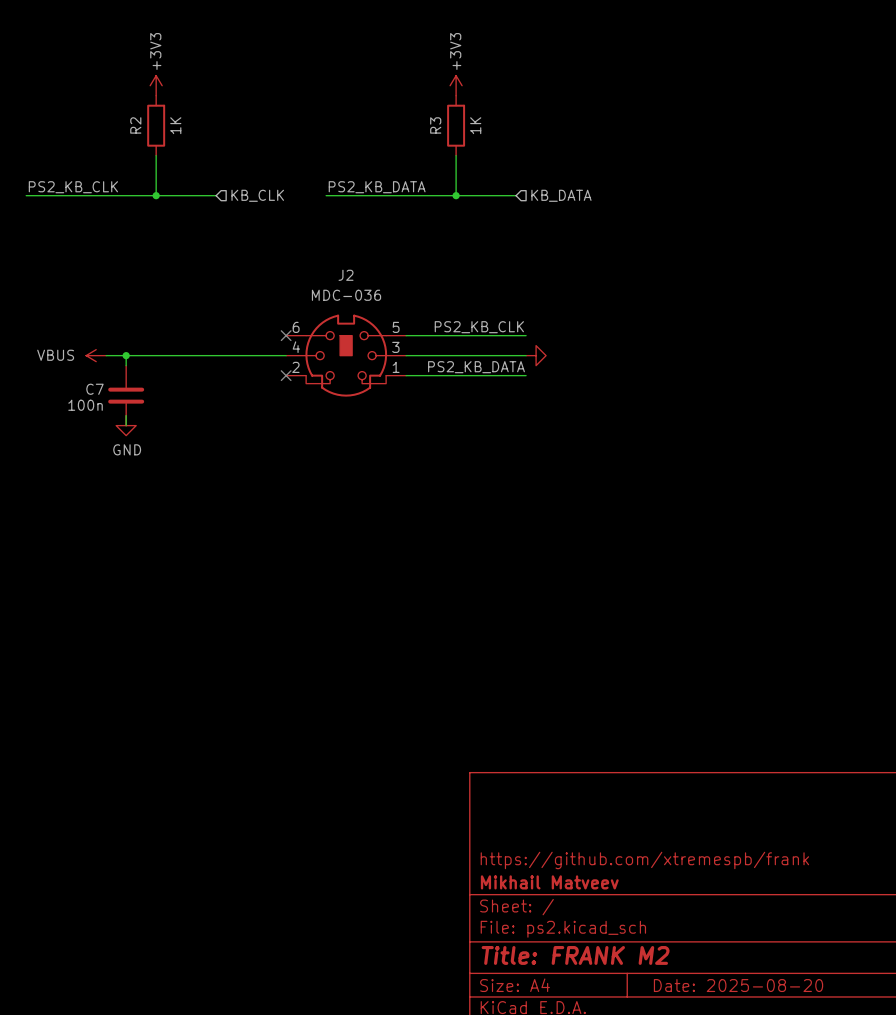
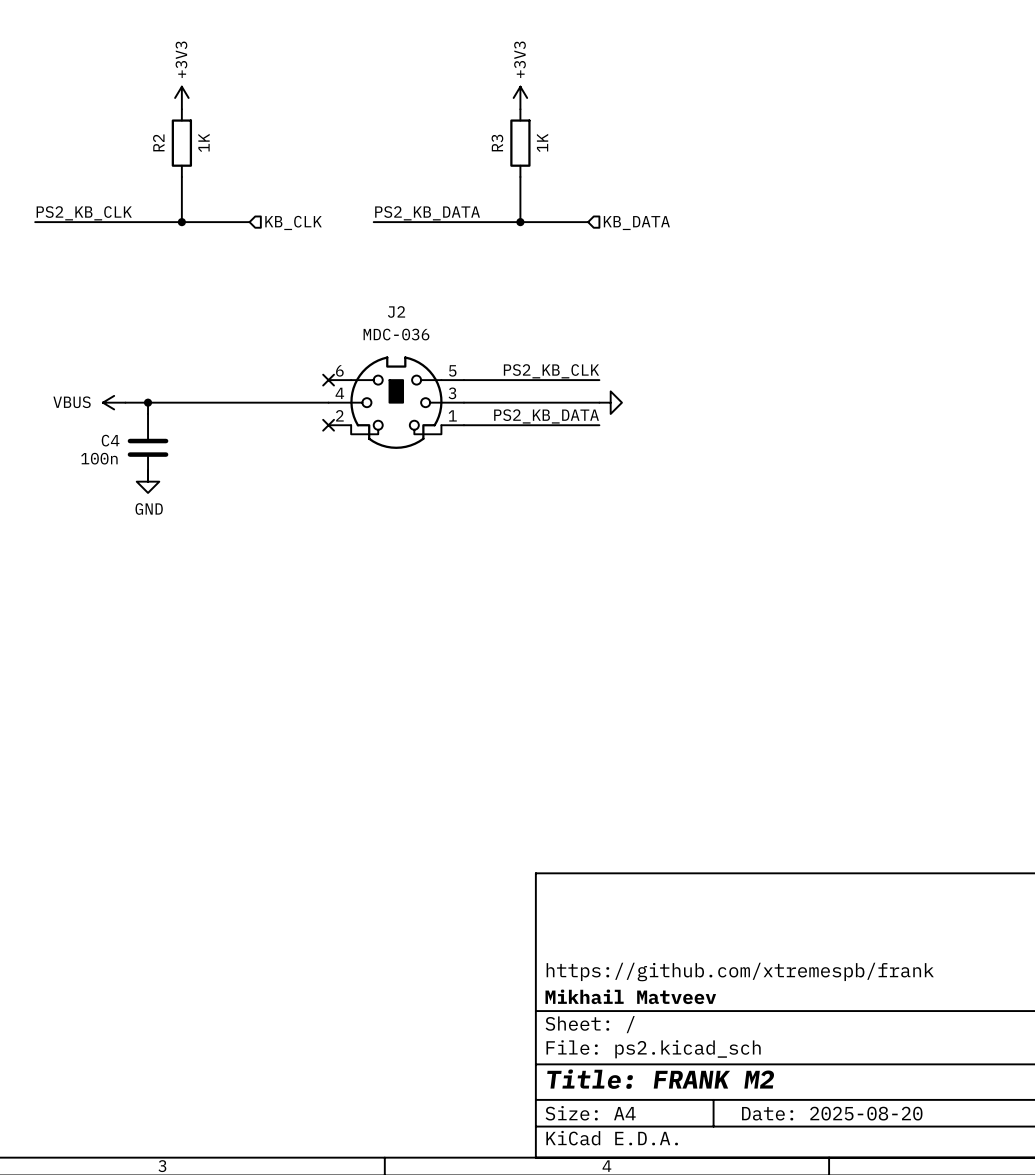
C7 name: C7 (94, 389) -> C4 (110, 440)

